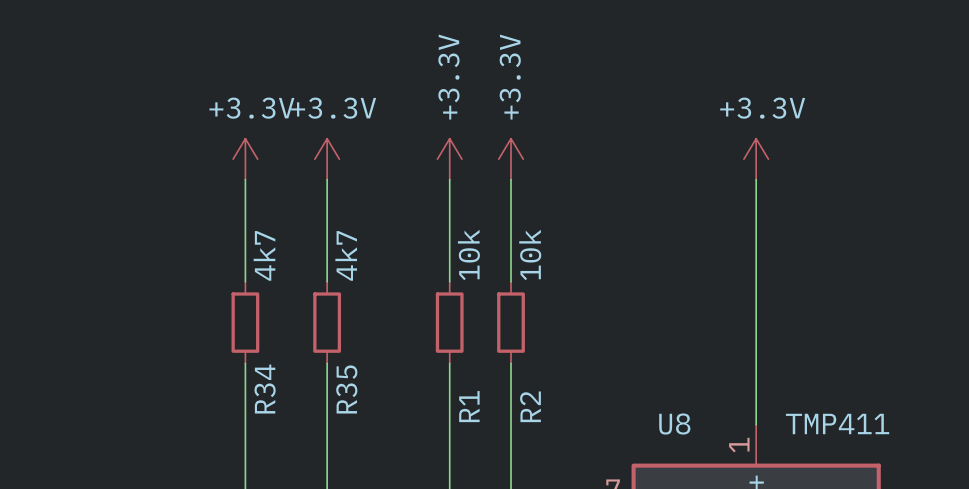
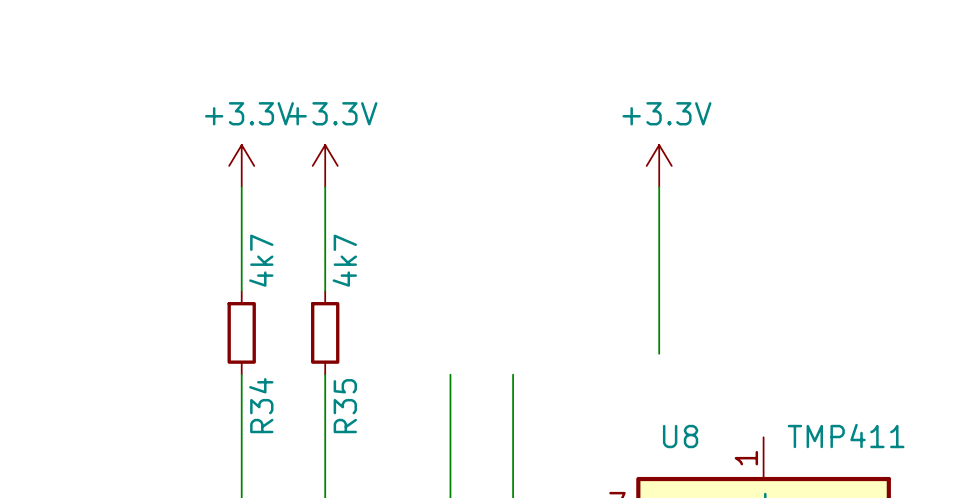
power symbol: +3.3V (449, 159) -> none
power symbol: +3.3V (511, 159) -> none
power symbol: none -> +3.3V (659, 165)
power symbol: +3.3V (756, 159) -> none
wire: (449, 179) (449, 281) -> none
wire: (511, 179) (511, 281) -> none
wire: none -> (659, 186) (659, 353)
wire: (756, 179) (756, 424) -> none
R1: 10k (449, 322) -> none
R2: 10k (511, 322) -> none

